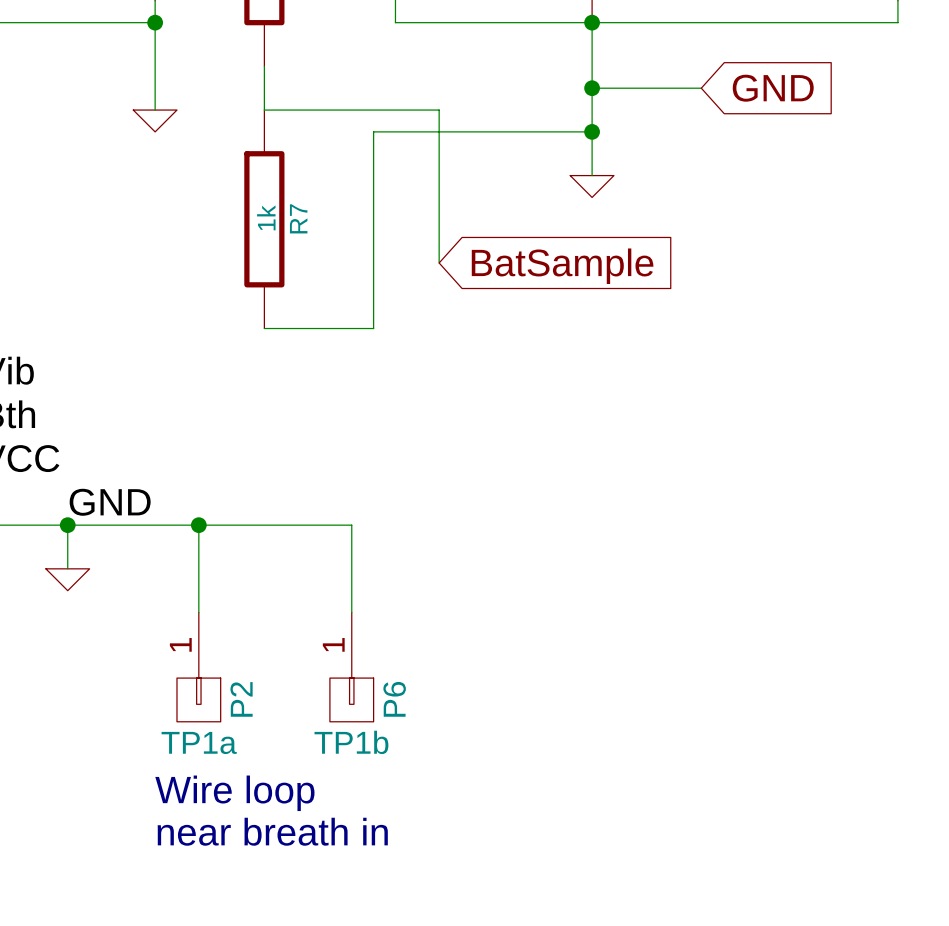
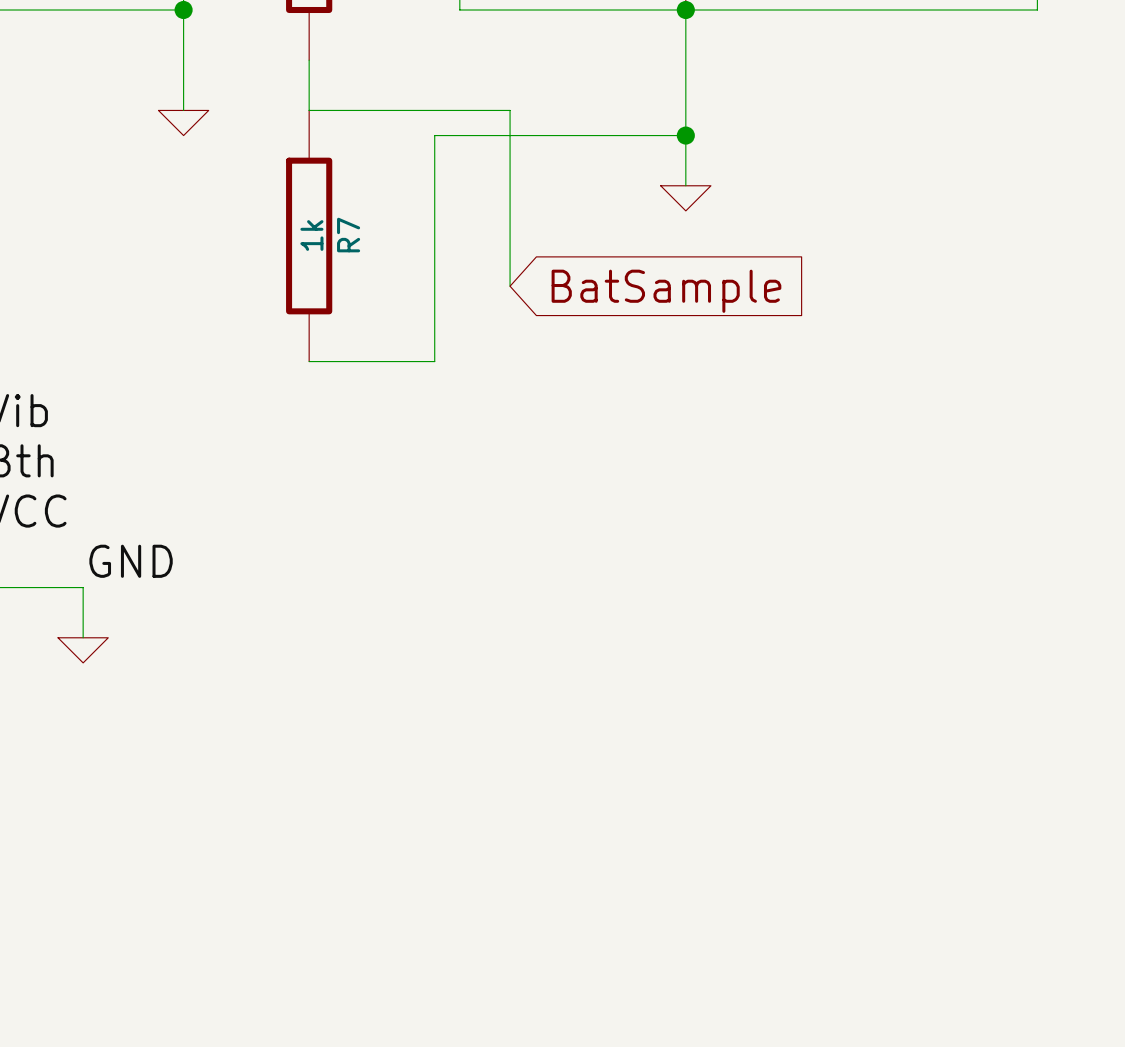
wire: (592, 88) (701, 88) -> none
junction: (592, 88) -> none
global label: GND (773, 88) -> none
wire: (67, 525) (351, 525) (351, 612) -> none
junction: (67, 525) -> none
wire: (198, 525) (198, 612) -> none
junction: (198, 525) -> none
P2: TP1a (198, 667) -> none
P6: TP1b (351, 667) -> none
text: Wire loop (234, 793) -> none
text: near breath in (272, 831) -> none

